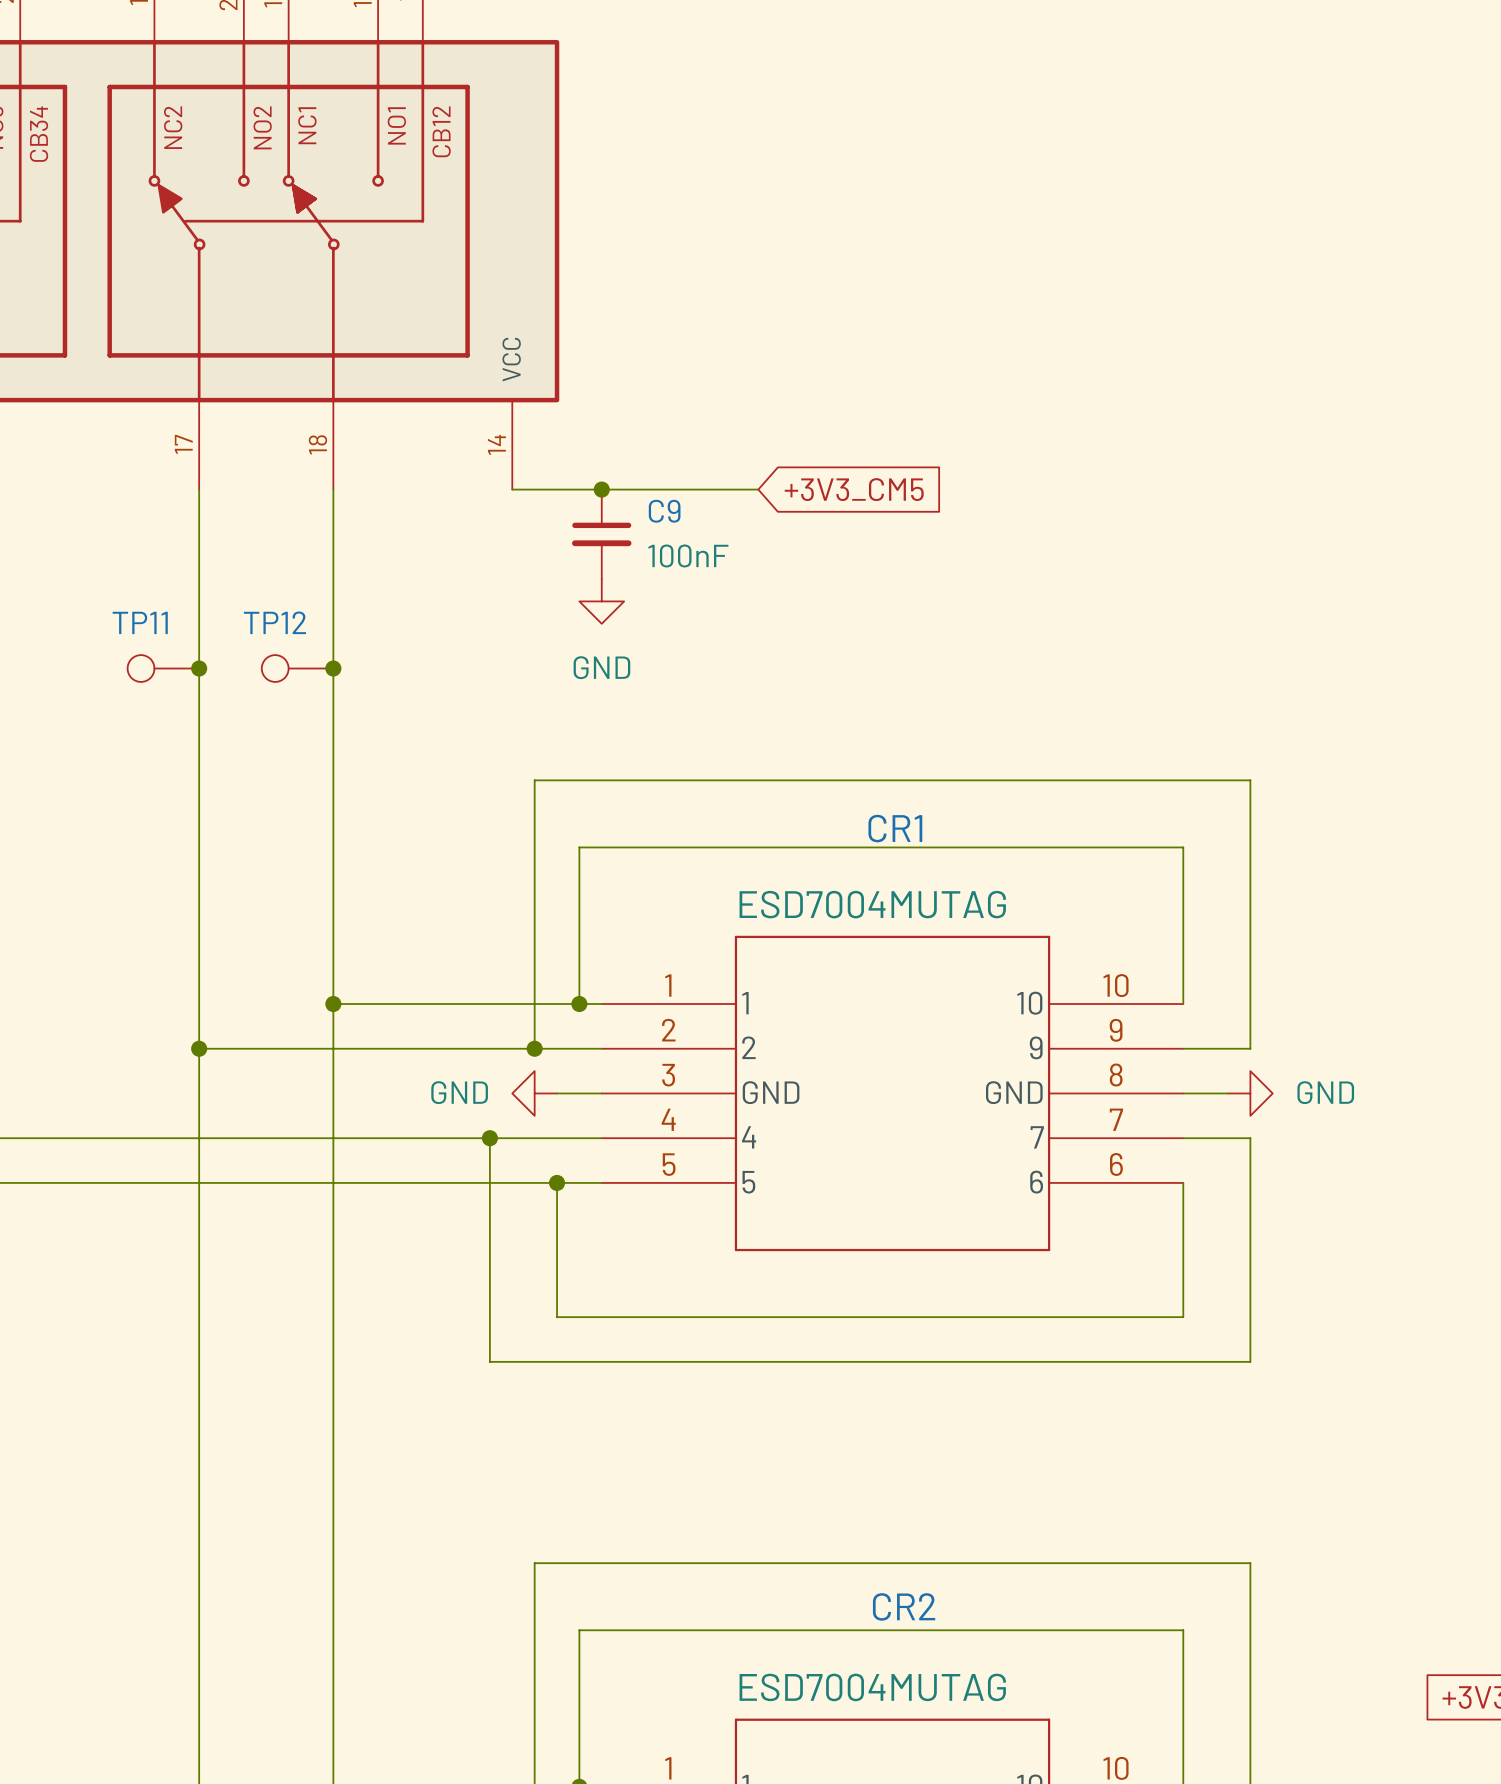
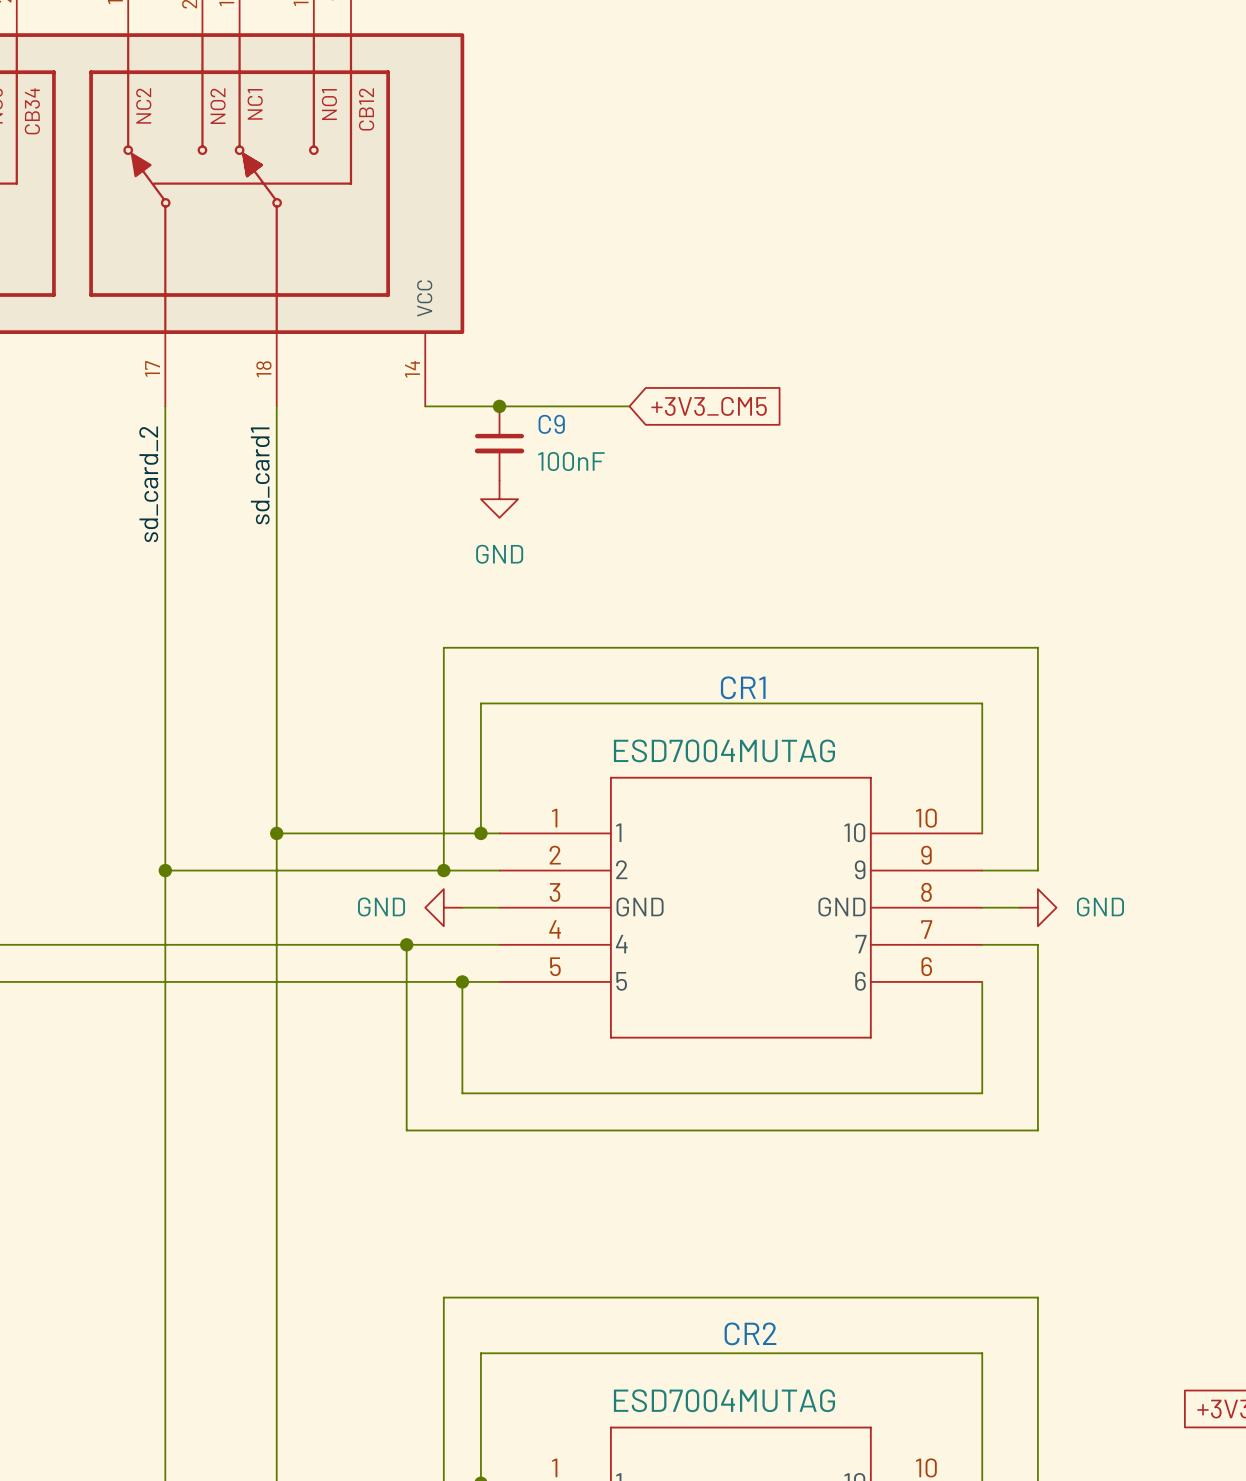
label: none -> sd_card1 (260, 475)
label: none -> sd_card_2 (148, 484)
TP11: (163, 668) -> none
junction: (199, 668) -> none
TP12: (297, 668) -> none
junction: (333, 668) -> none

